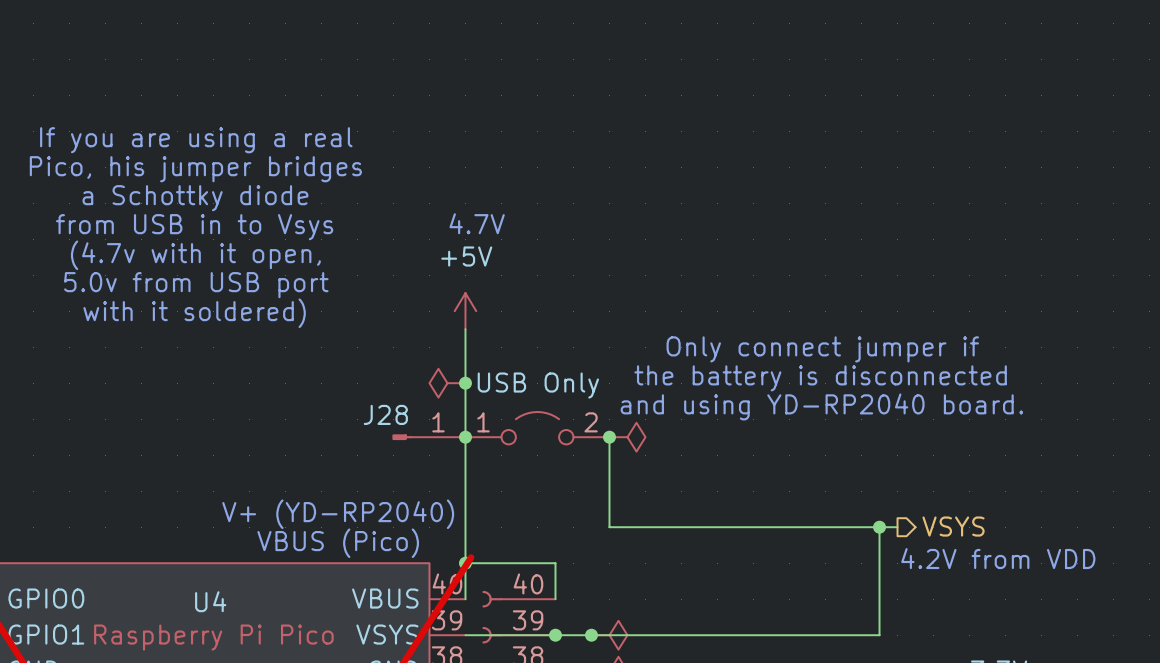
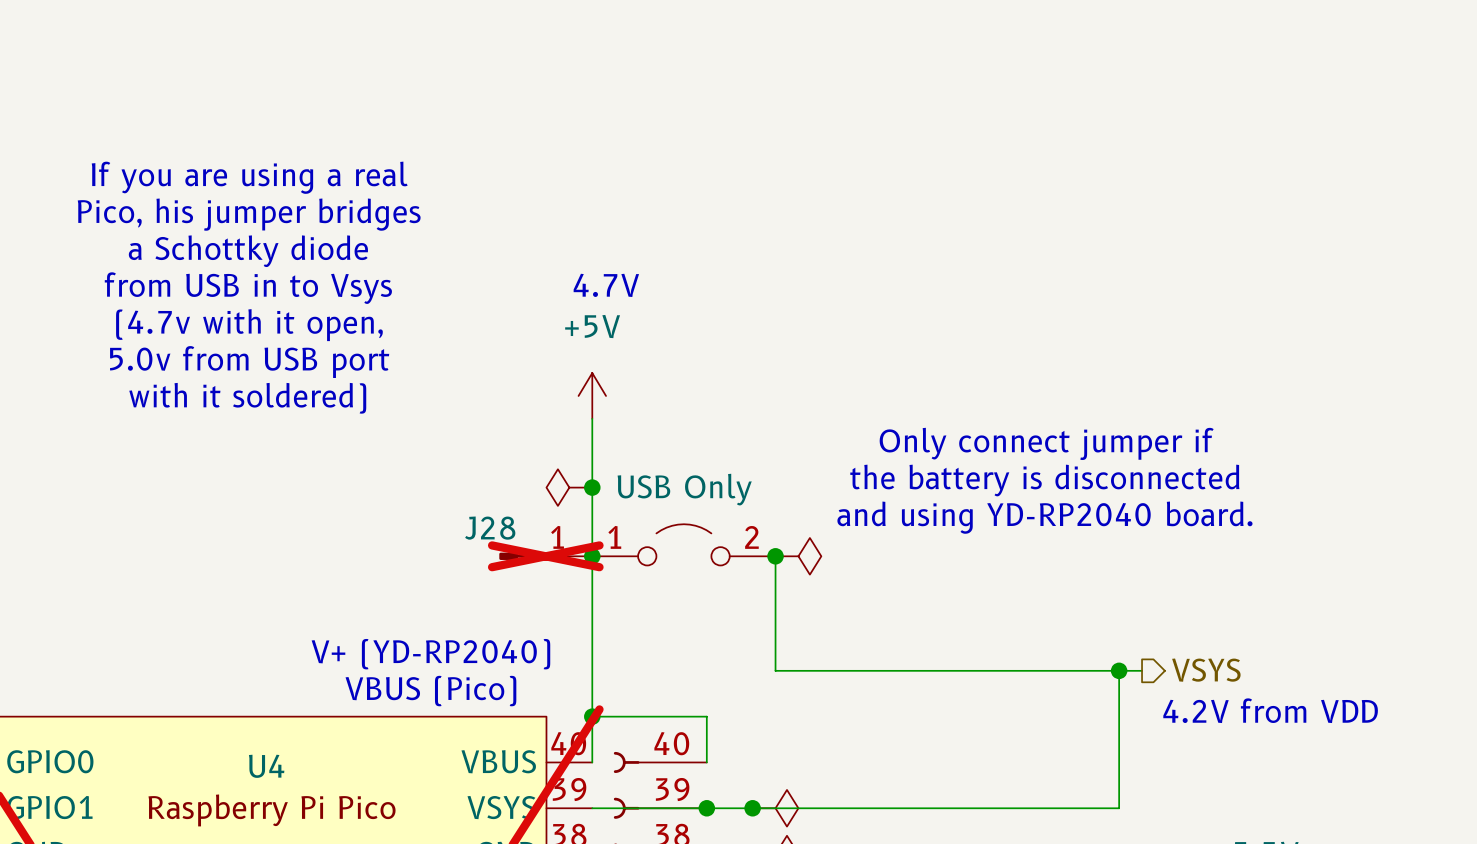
J28 do-not-place cross: none -> (545, 556)

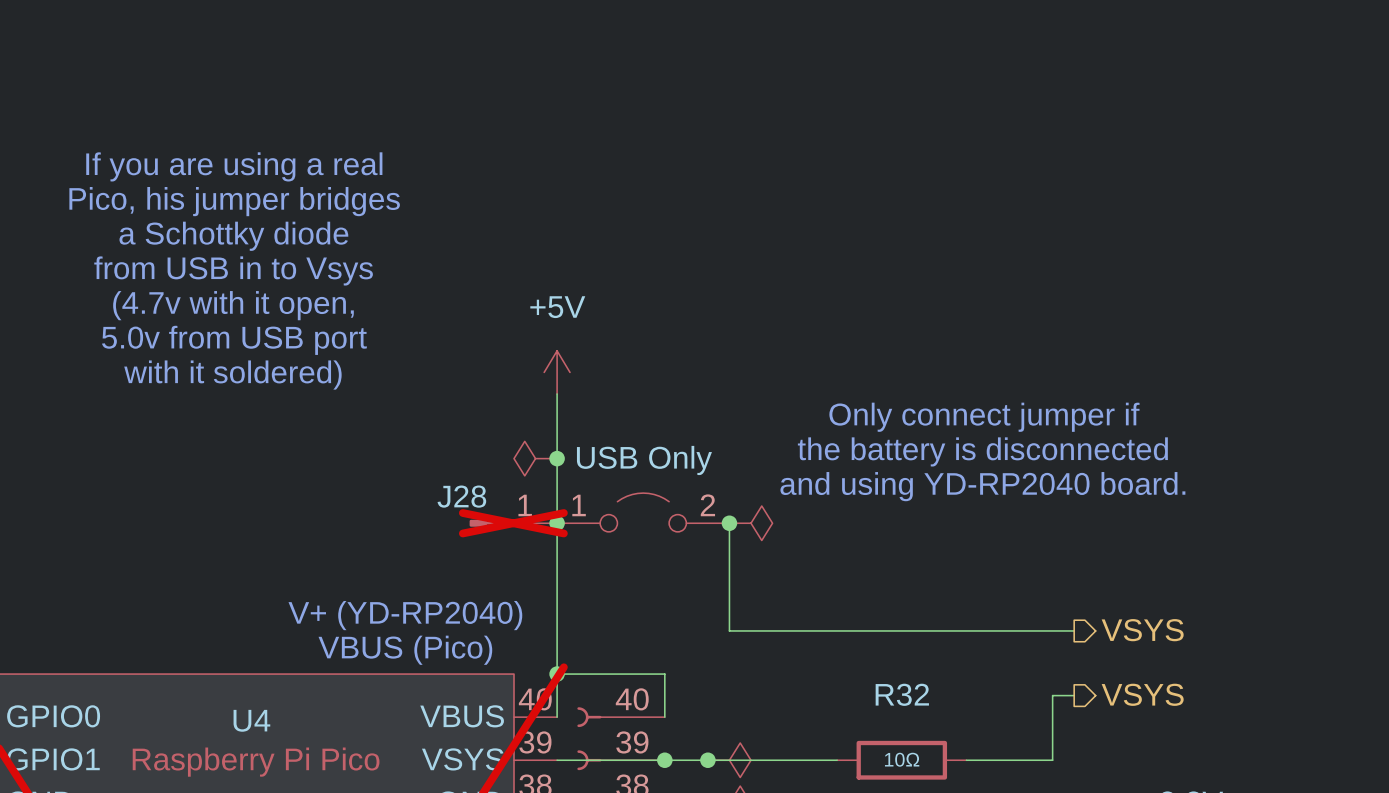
text: 4.7V (606, 285) -> none
wire: (1119, 670) (1119, 739) -> (1074, 695) (1052, 695)
junction: (1119, 670) -> none
text: 4.2V from VDD (1270, 710) -> none
hierarchical label: none -> VSYS (1142, 694)
wire: (890, 808) (1027, 808) -> none
R32: none -> 10Ω (901, 760)

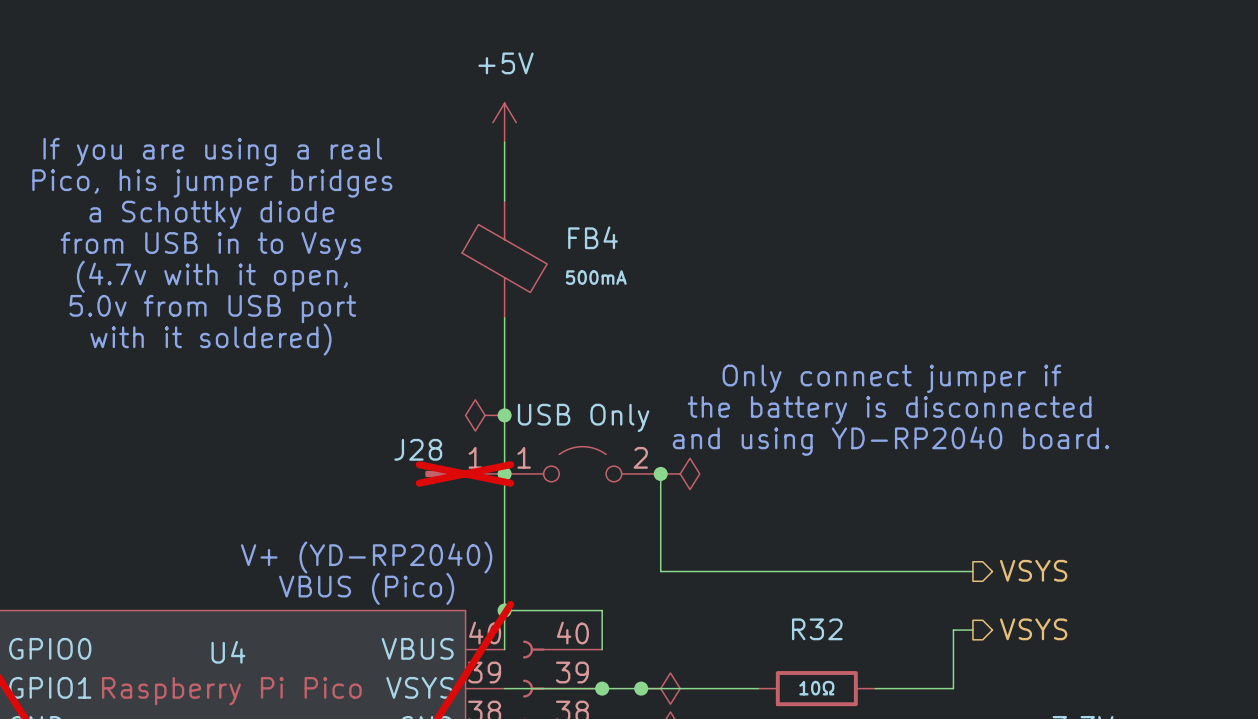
wire: none -> (504, 142) (504, 200)
FB4: none -> (504, 259)
power symbol position: +5V (557, 372) -> +5V (504, 122)

